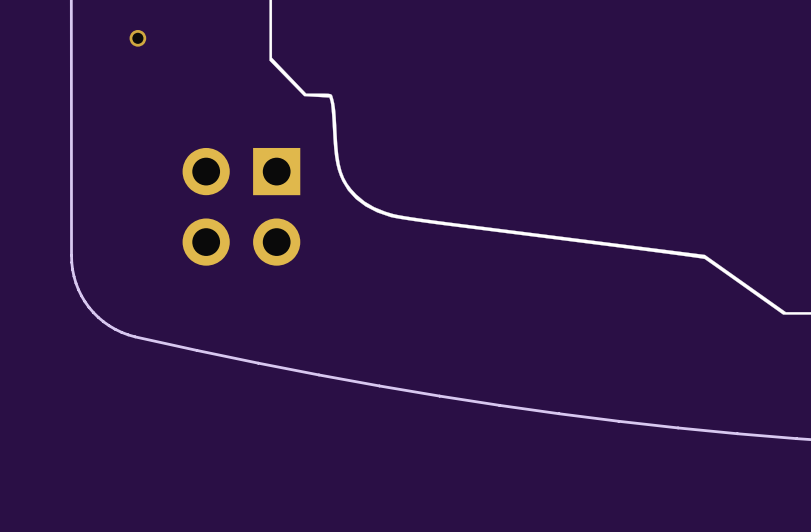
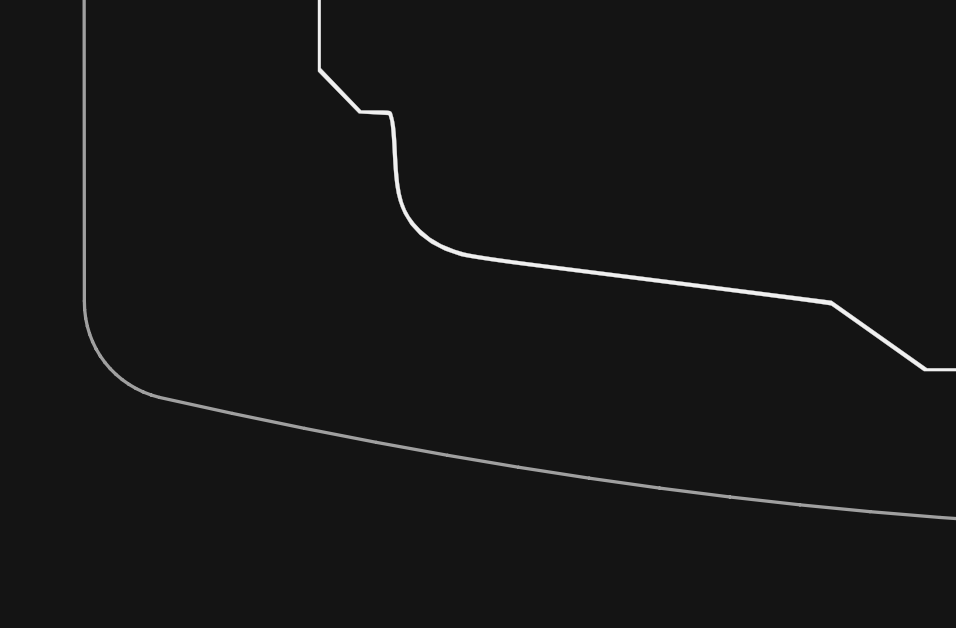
via: (137, 38) -> none
part: (241, 206) -> none

